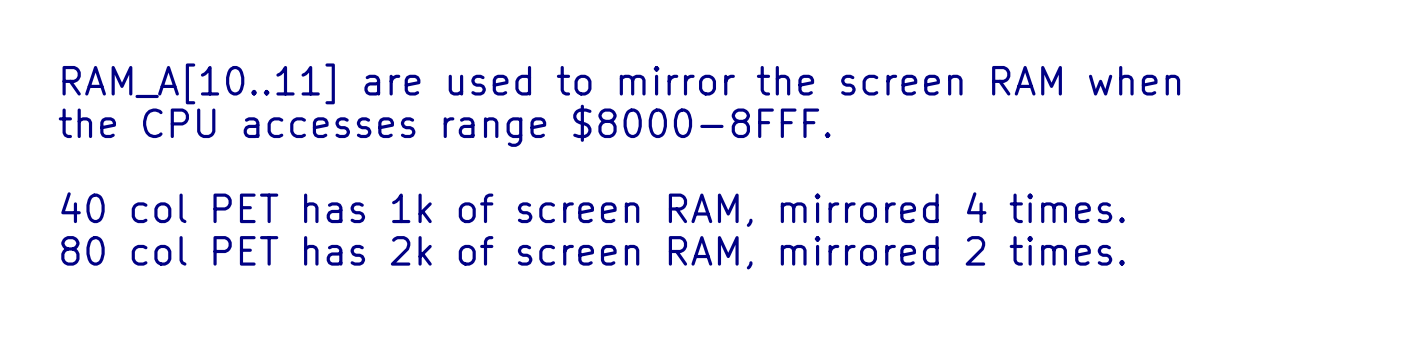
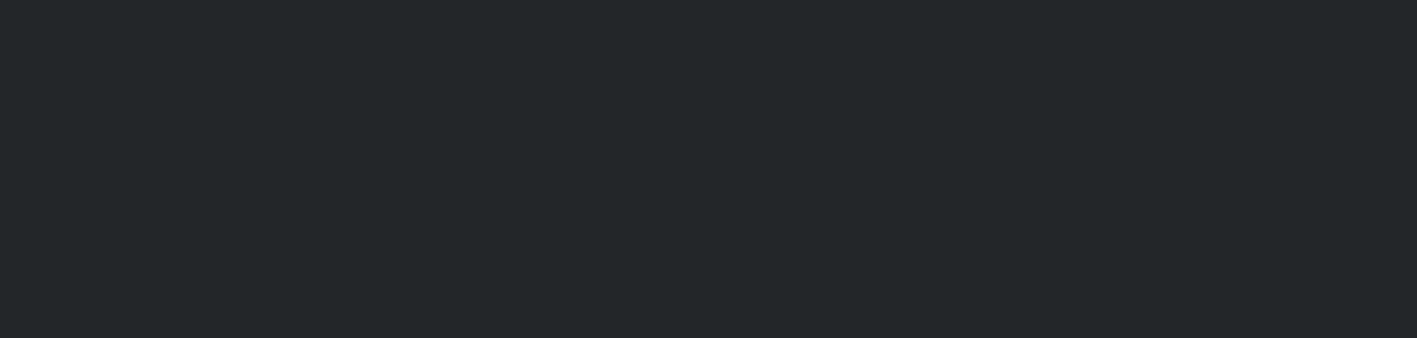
text: RAM_A[10..11] are used to mirror the screen RAM when (621, 83) -> none
text: the CPU accesses range $8000-8FFF. (444, 125) -> none
text: 40 col PET has 1k of screen RAM, mirrored 4 times. (593, 209) -> none
text: 80 col PET has 2k of screen RAM, mirrored 2 times. (593, 252) -> none

